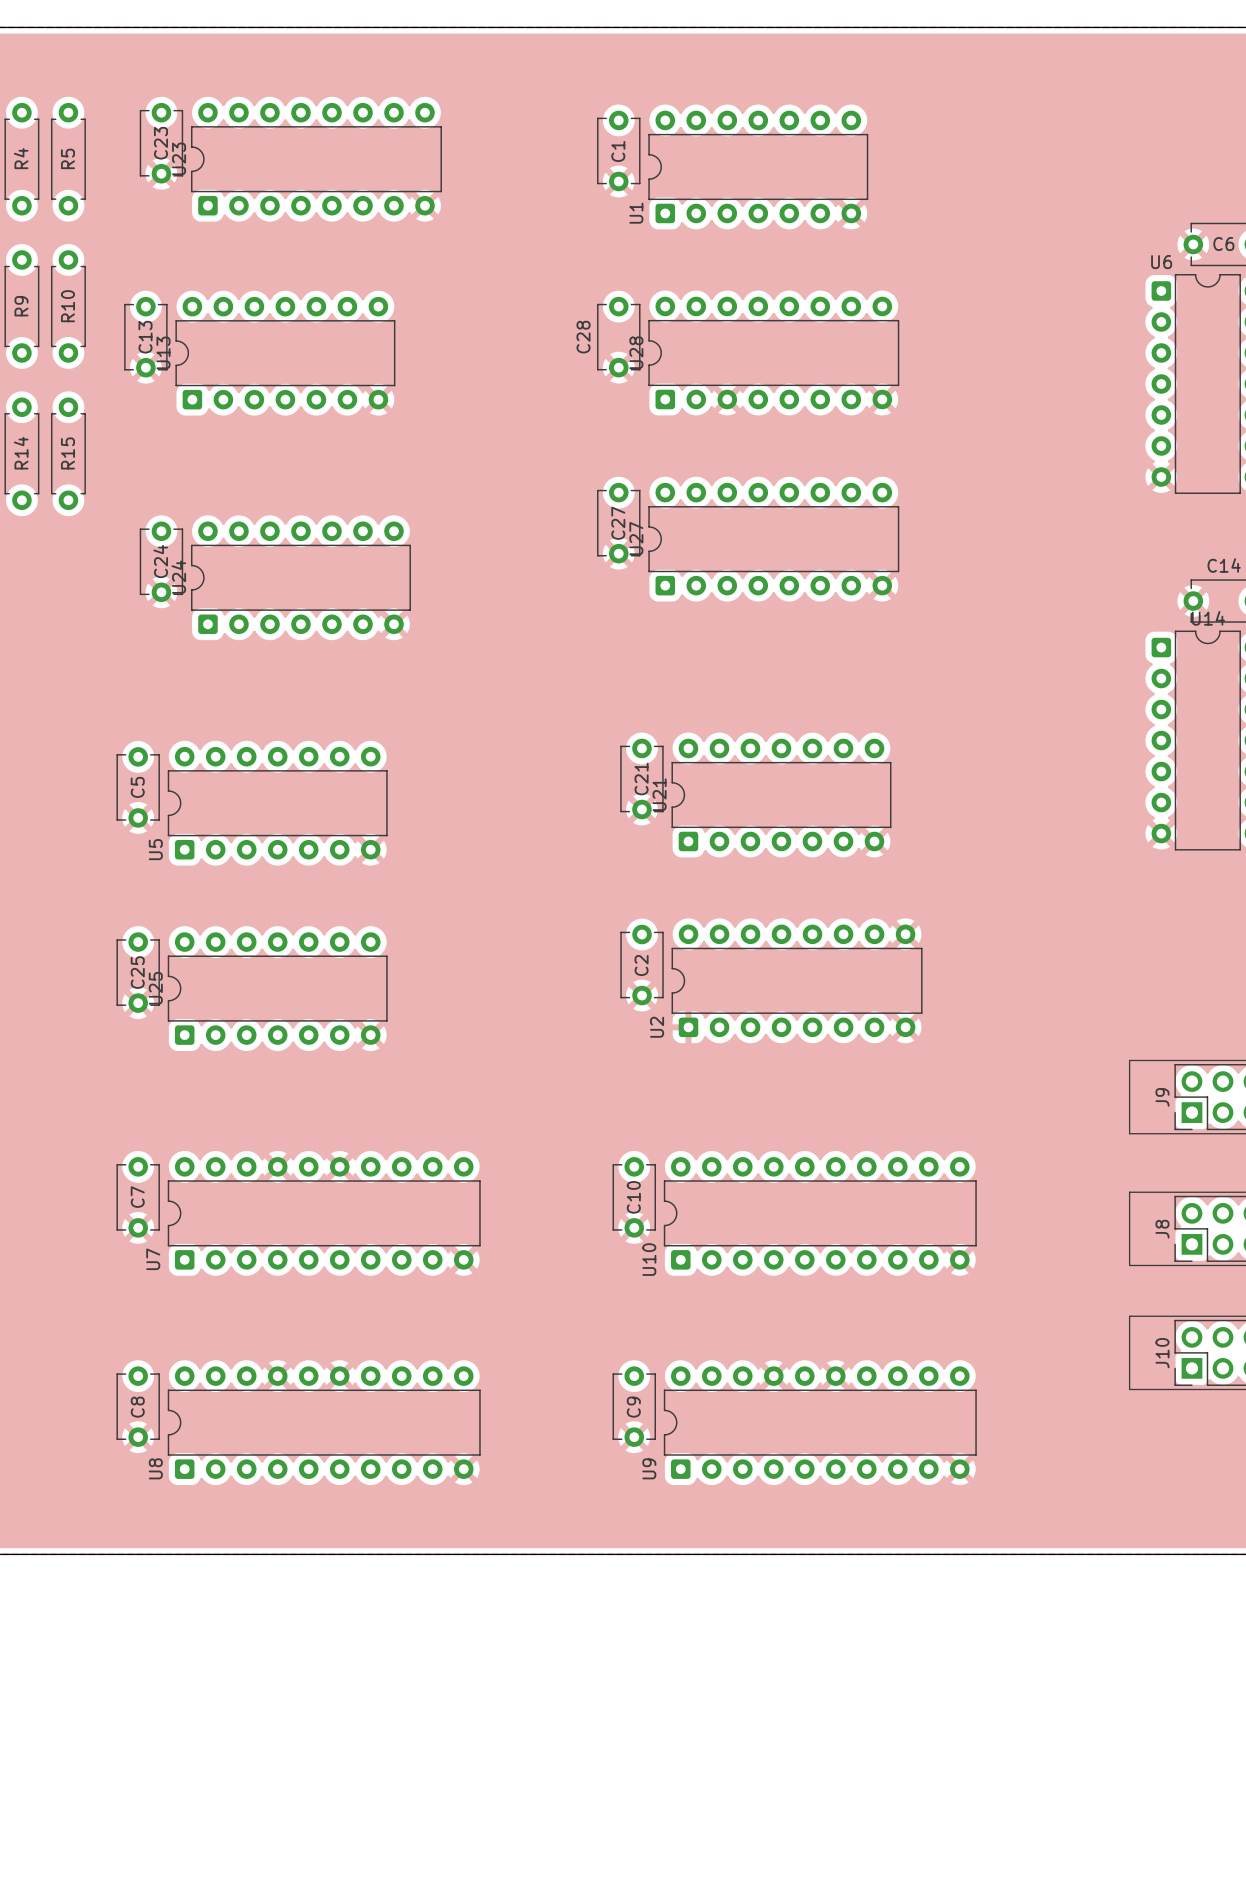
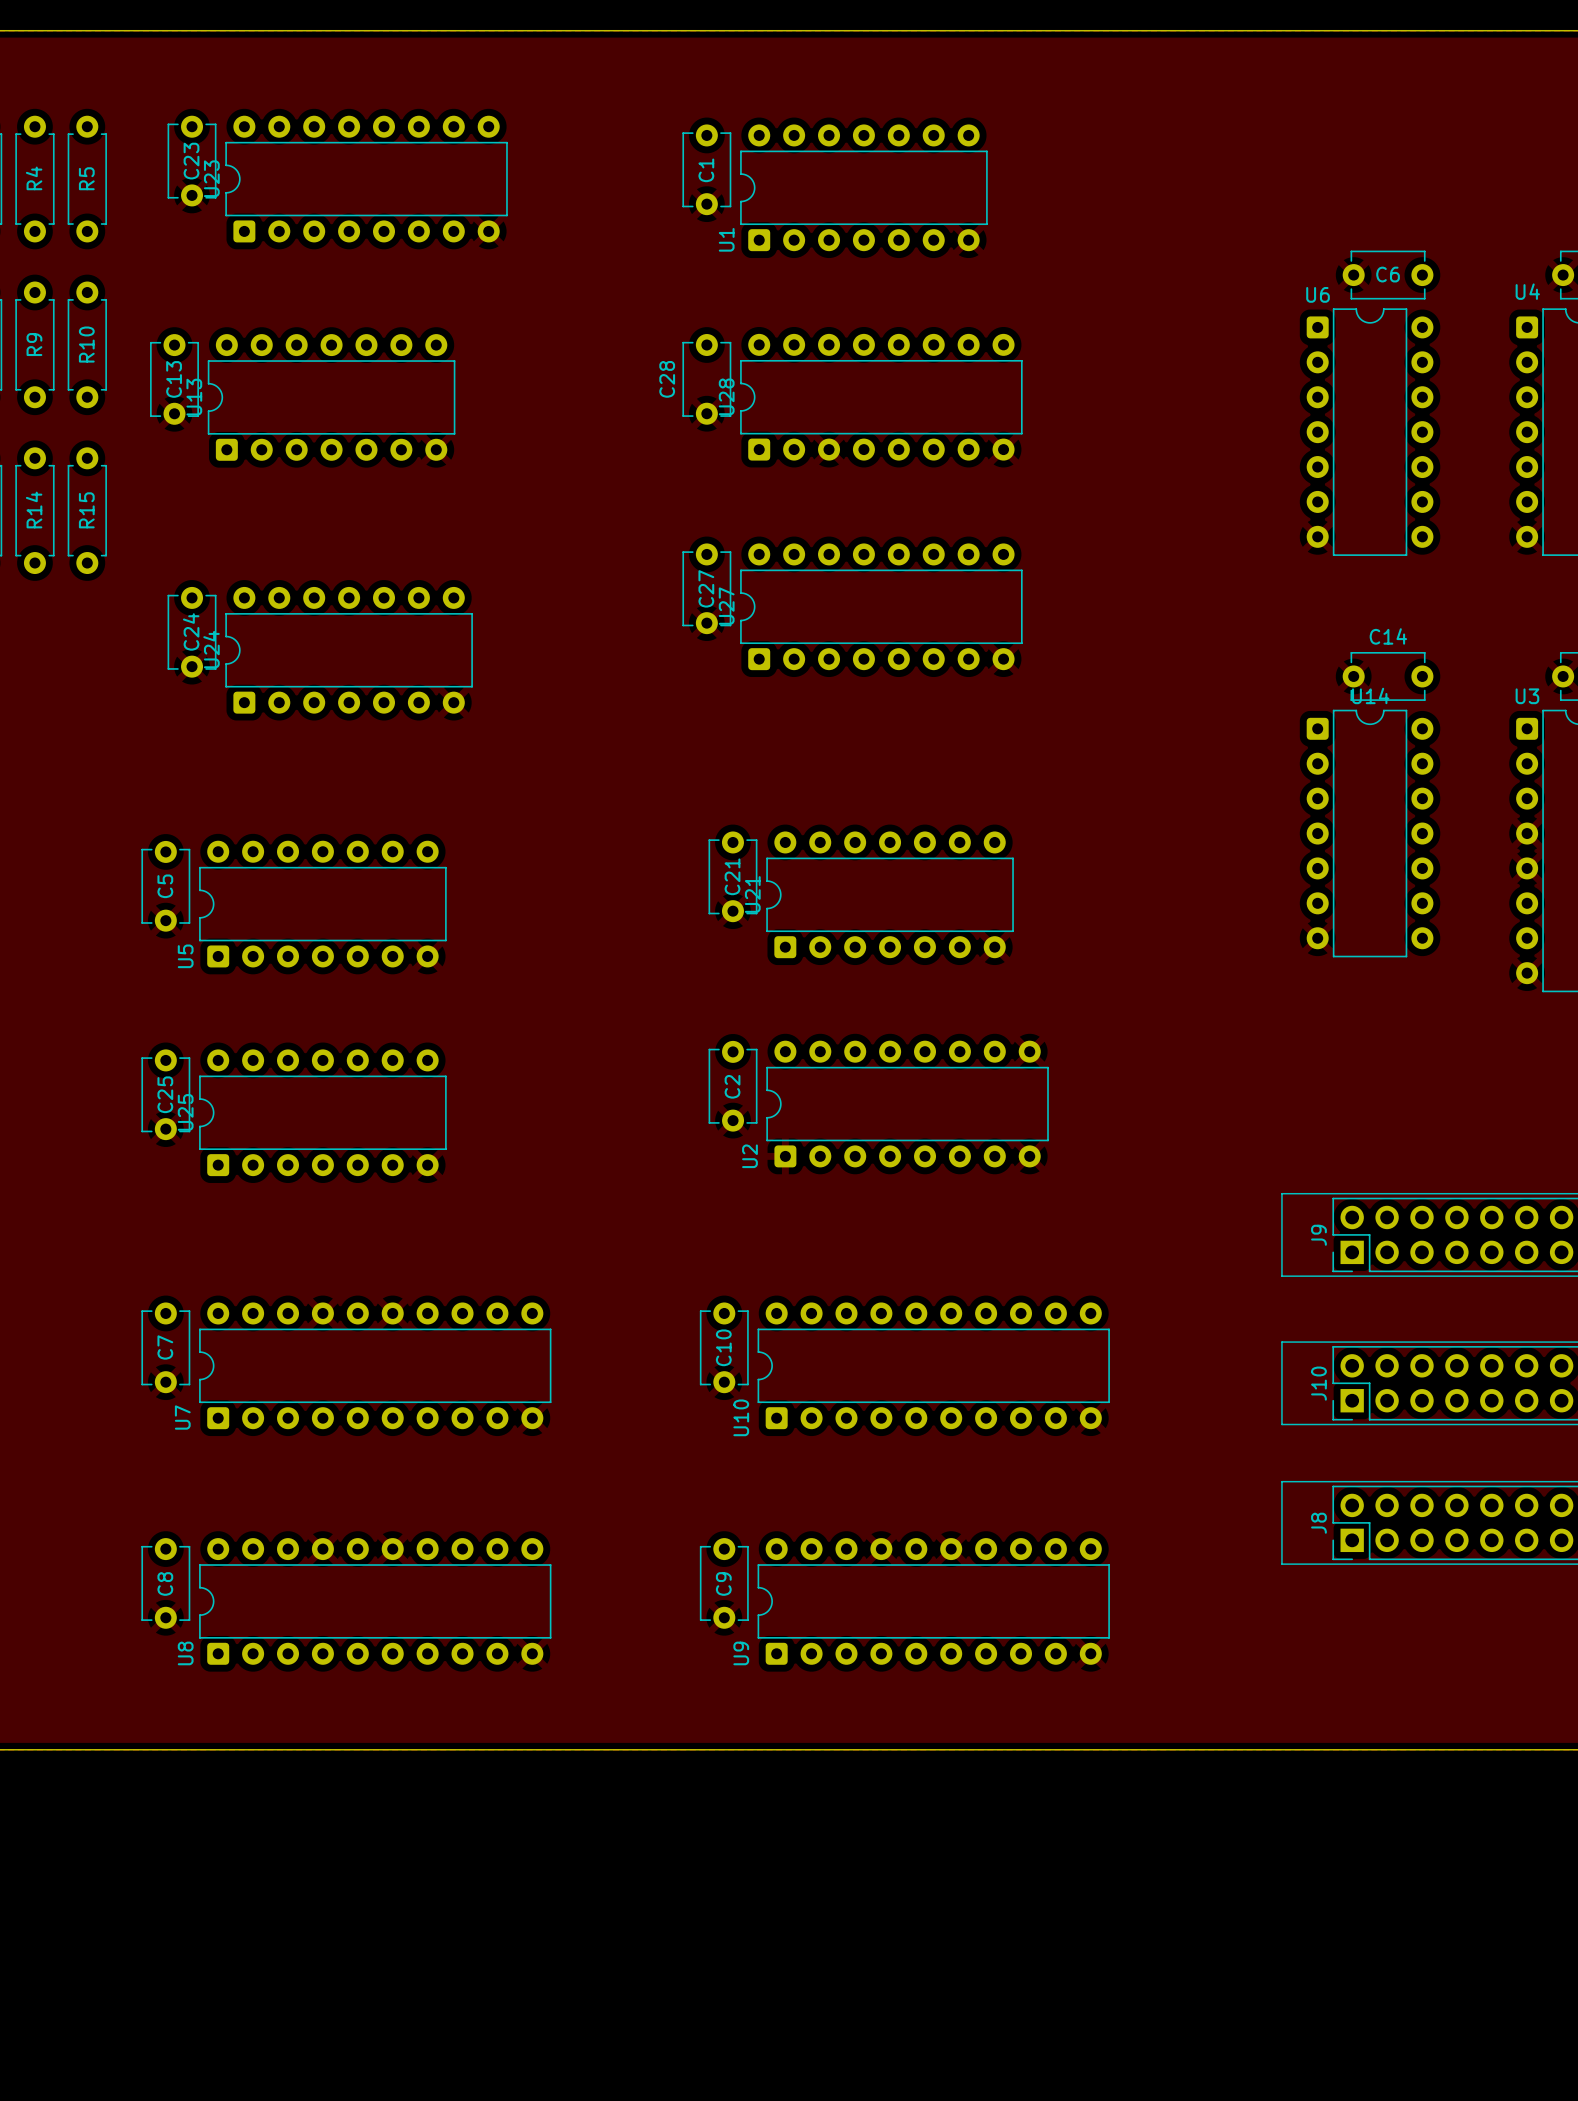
J8 name: J8 (1162, 1229) -> J10 (1318, 1383)
J10 name: J10 (1162, 1353) -> J8 (1318, 1523)

